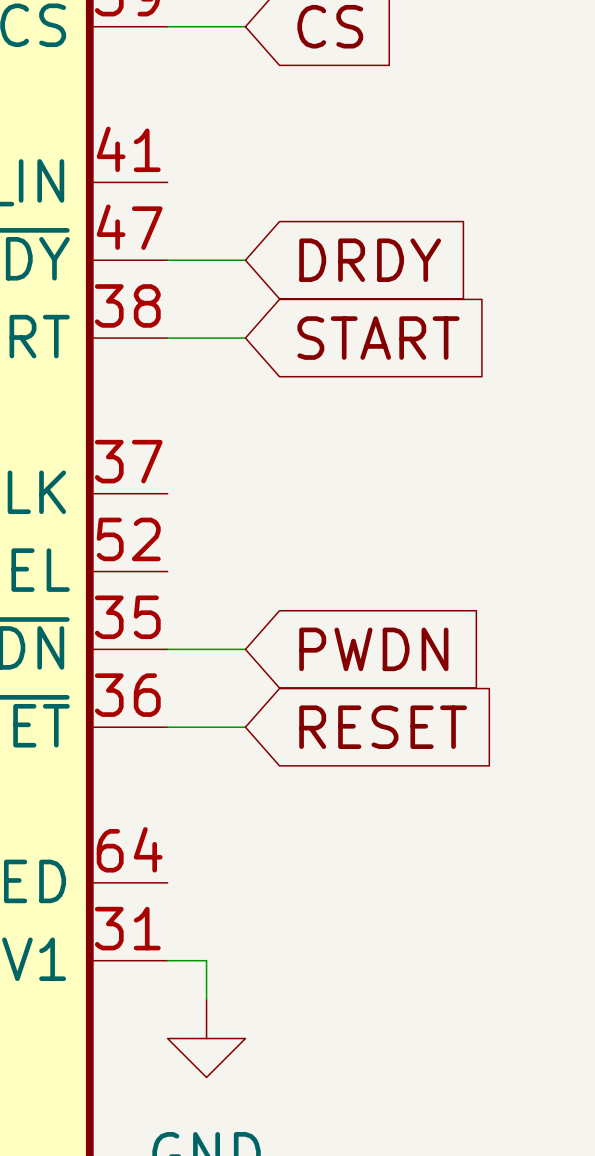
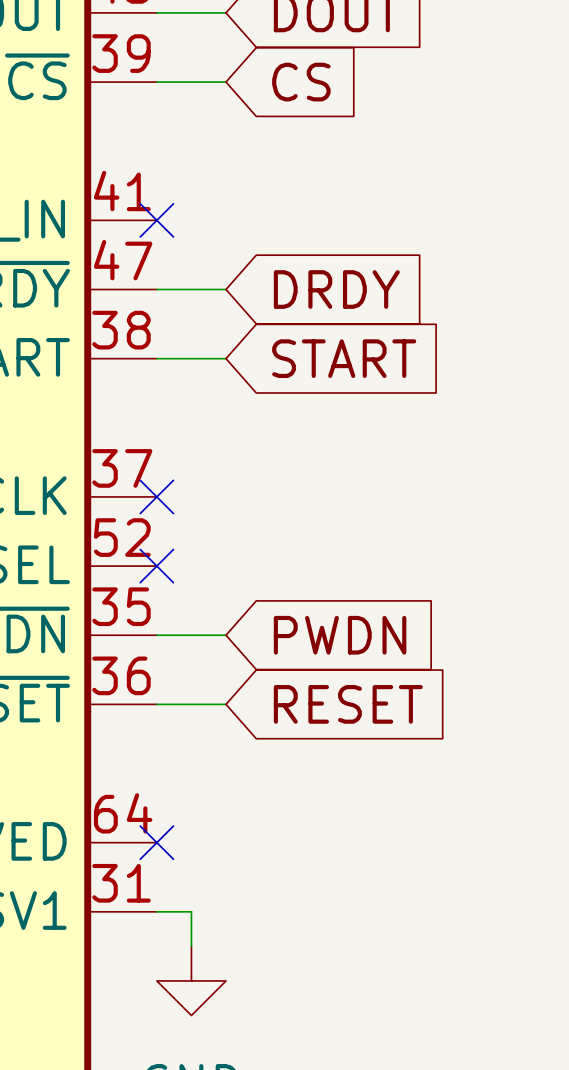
no-connect mark: none -> (156, 220)
no-connect mark: none -> (156, 496)
no-connect mark: none -> (156, 566)
no-connect mark: none -> (156, 842)

